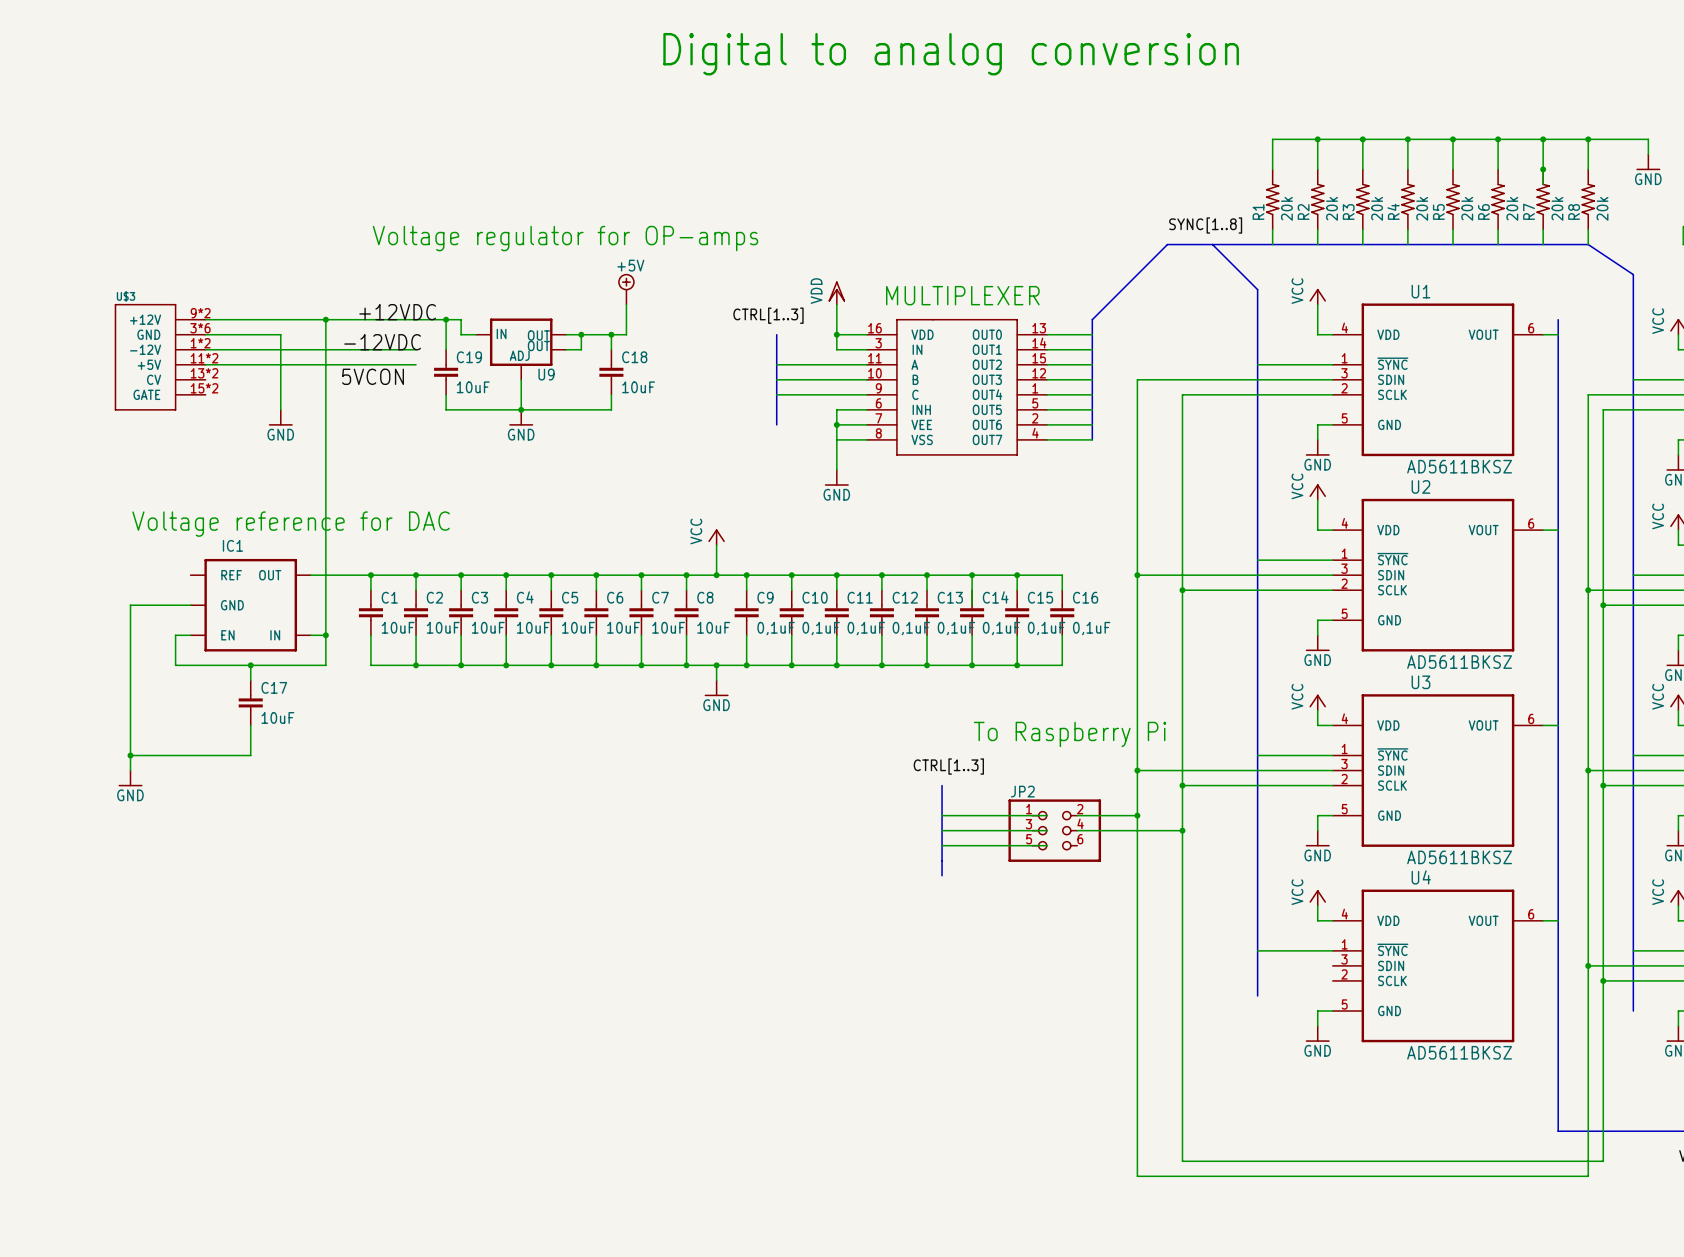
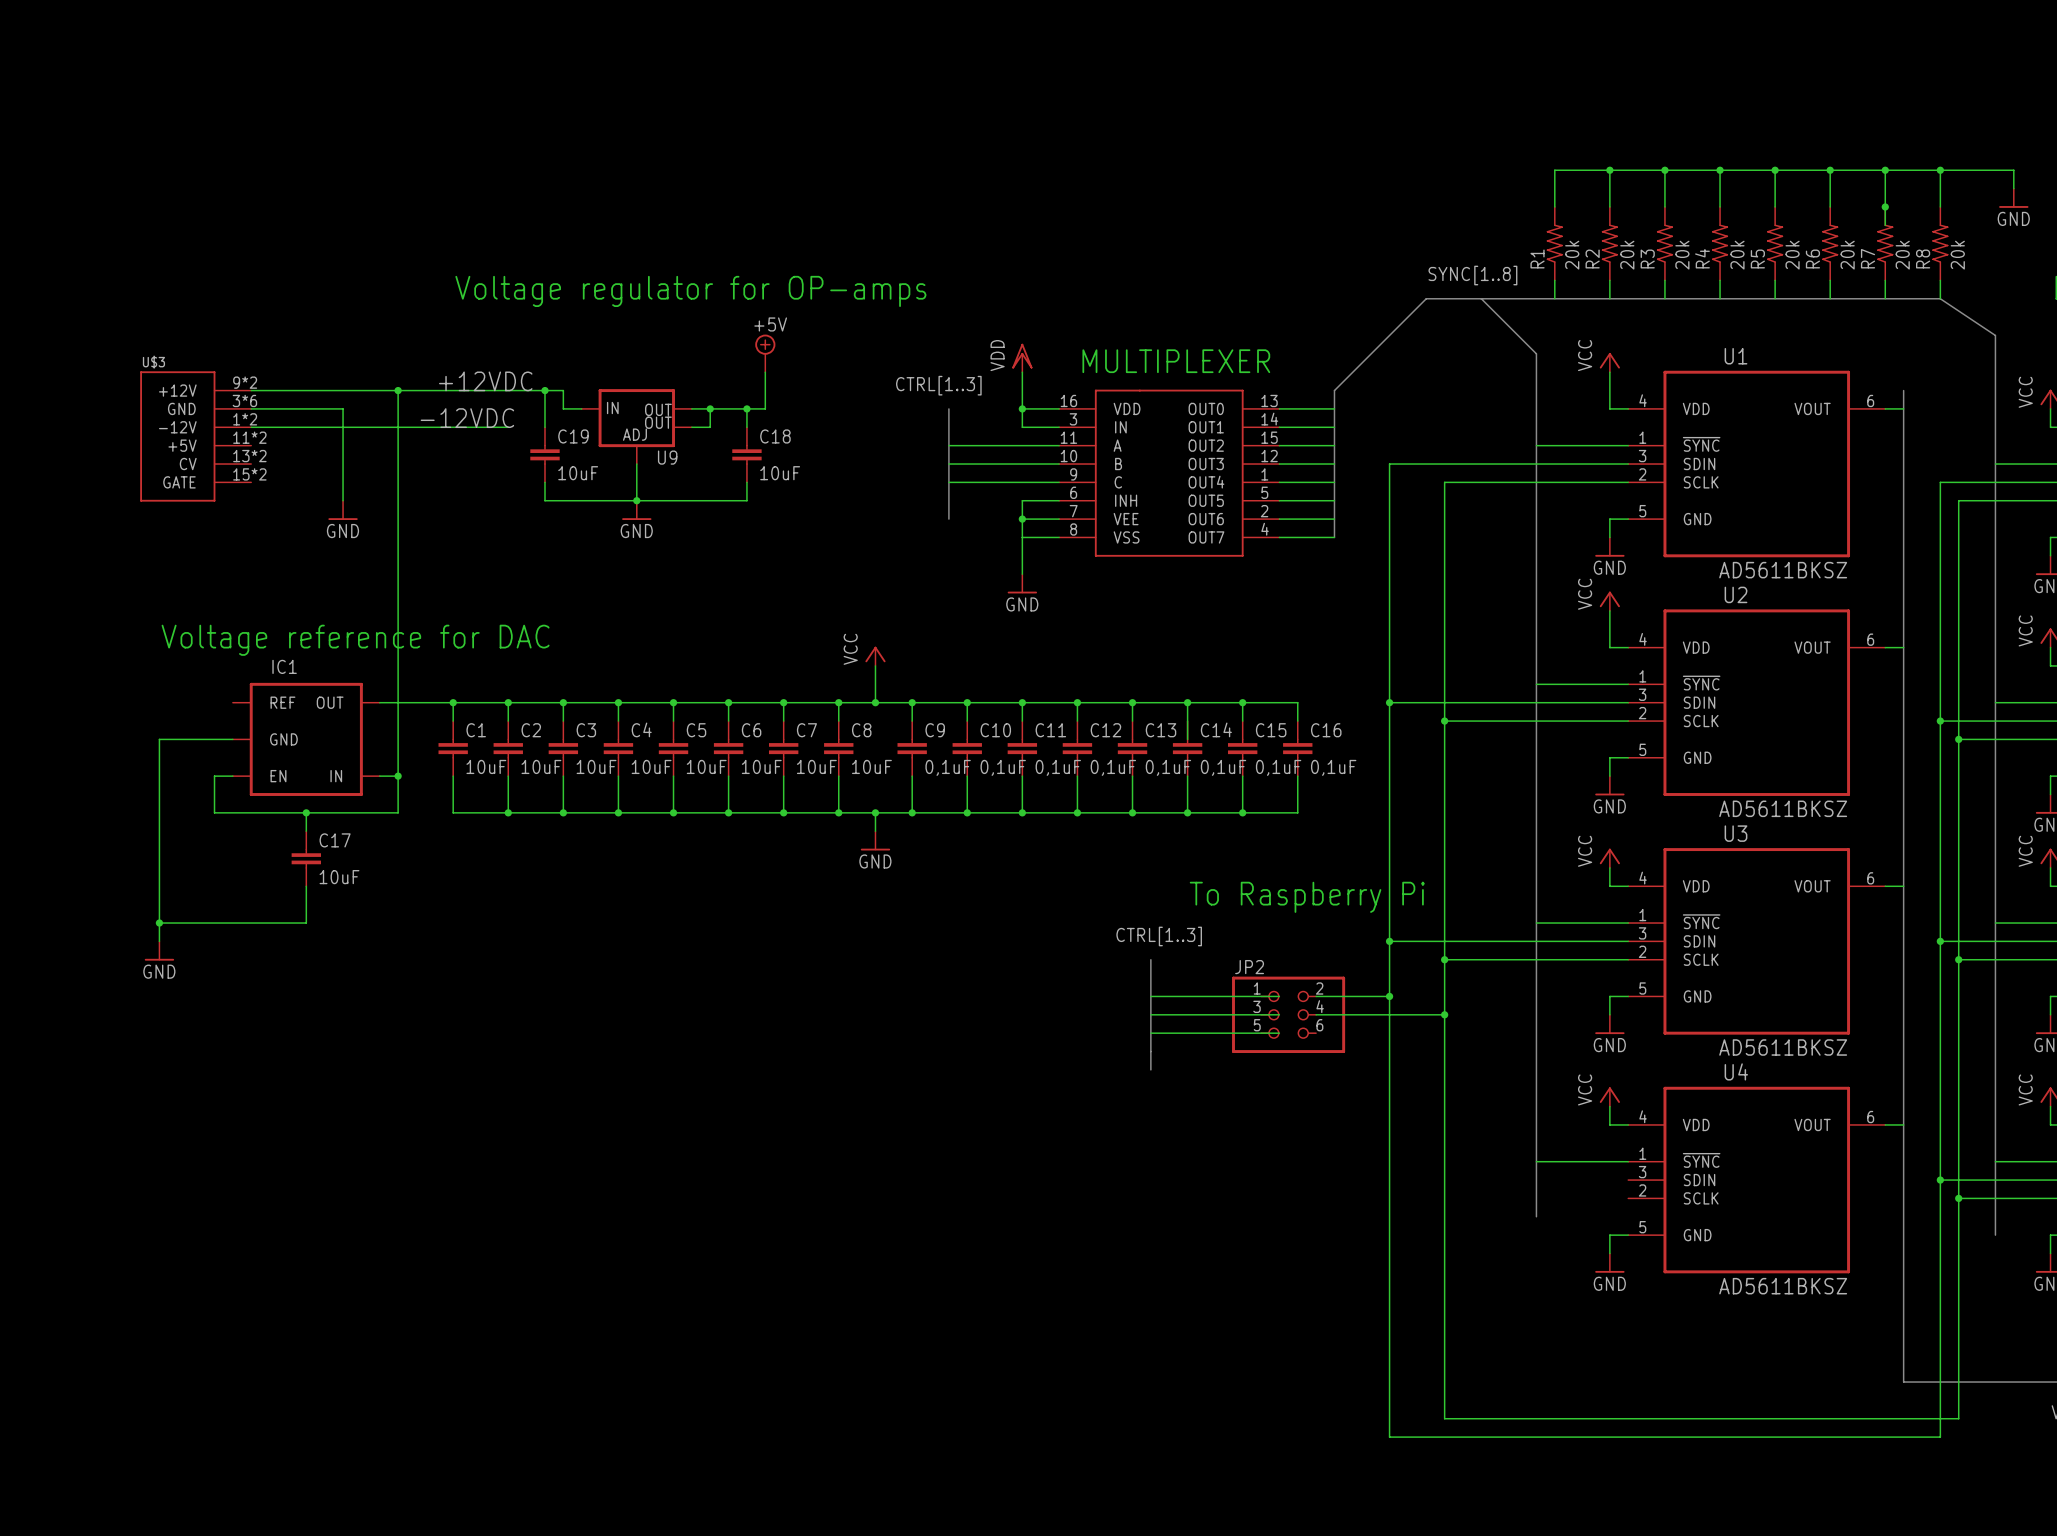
text: Digital to analog conversion (951, 54) -> none
wire: (205, 364) (416, 364) -> none
label: 5VCON (373, 376) -> none

